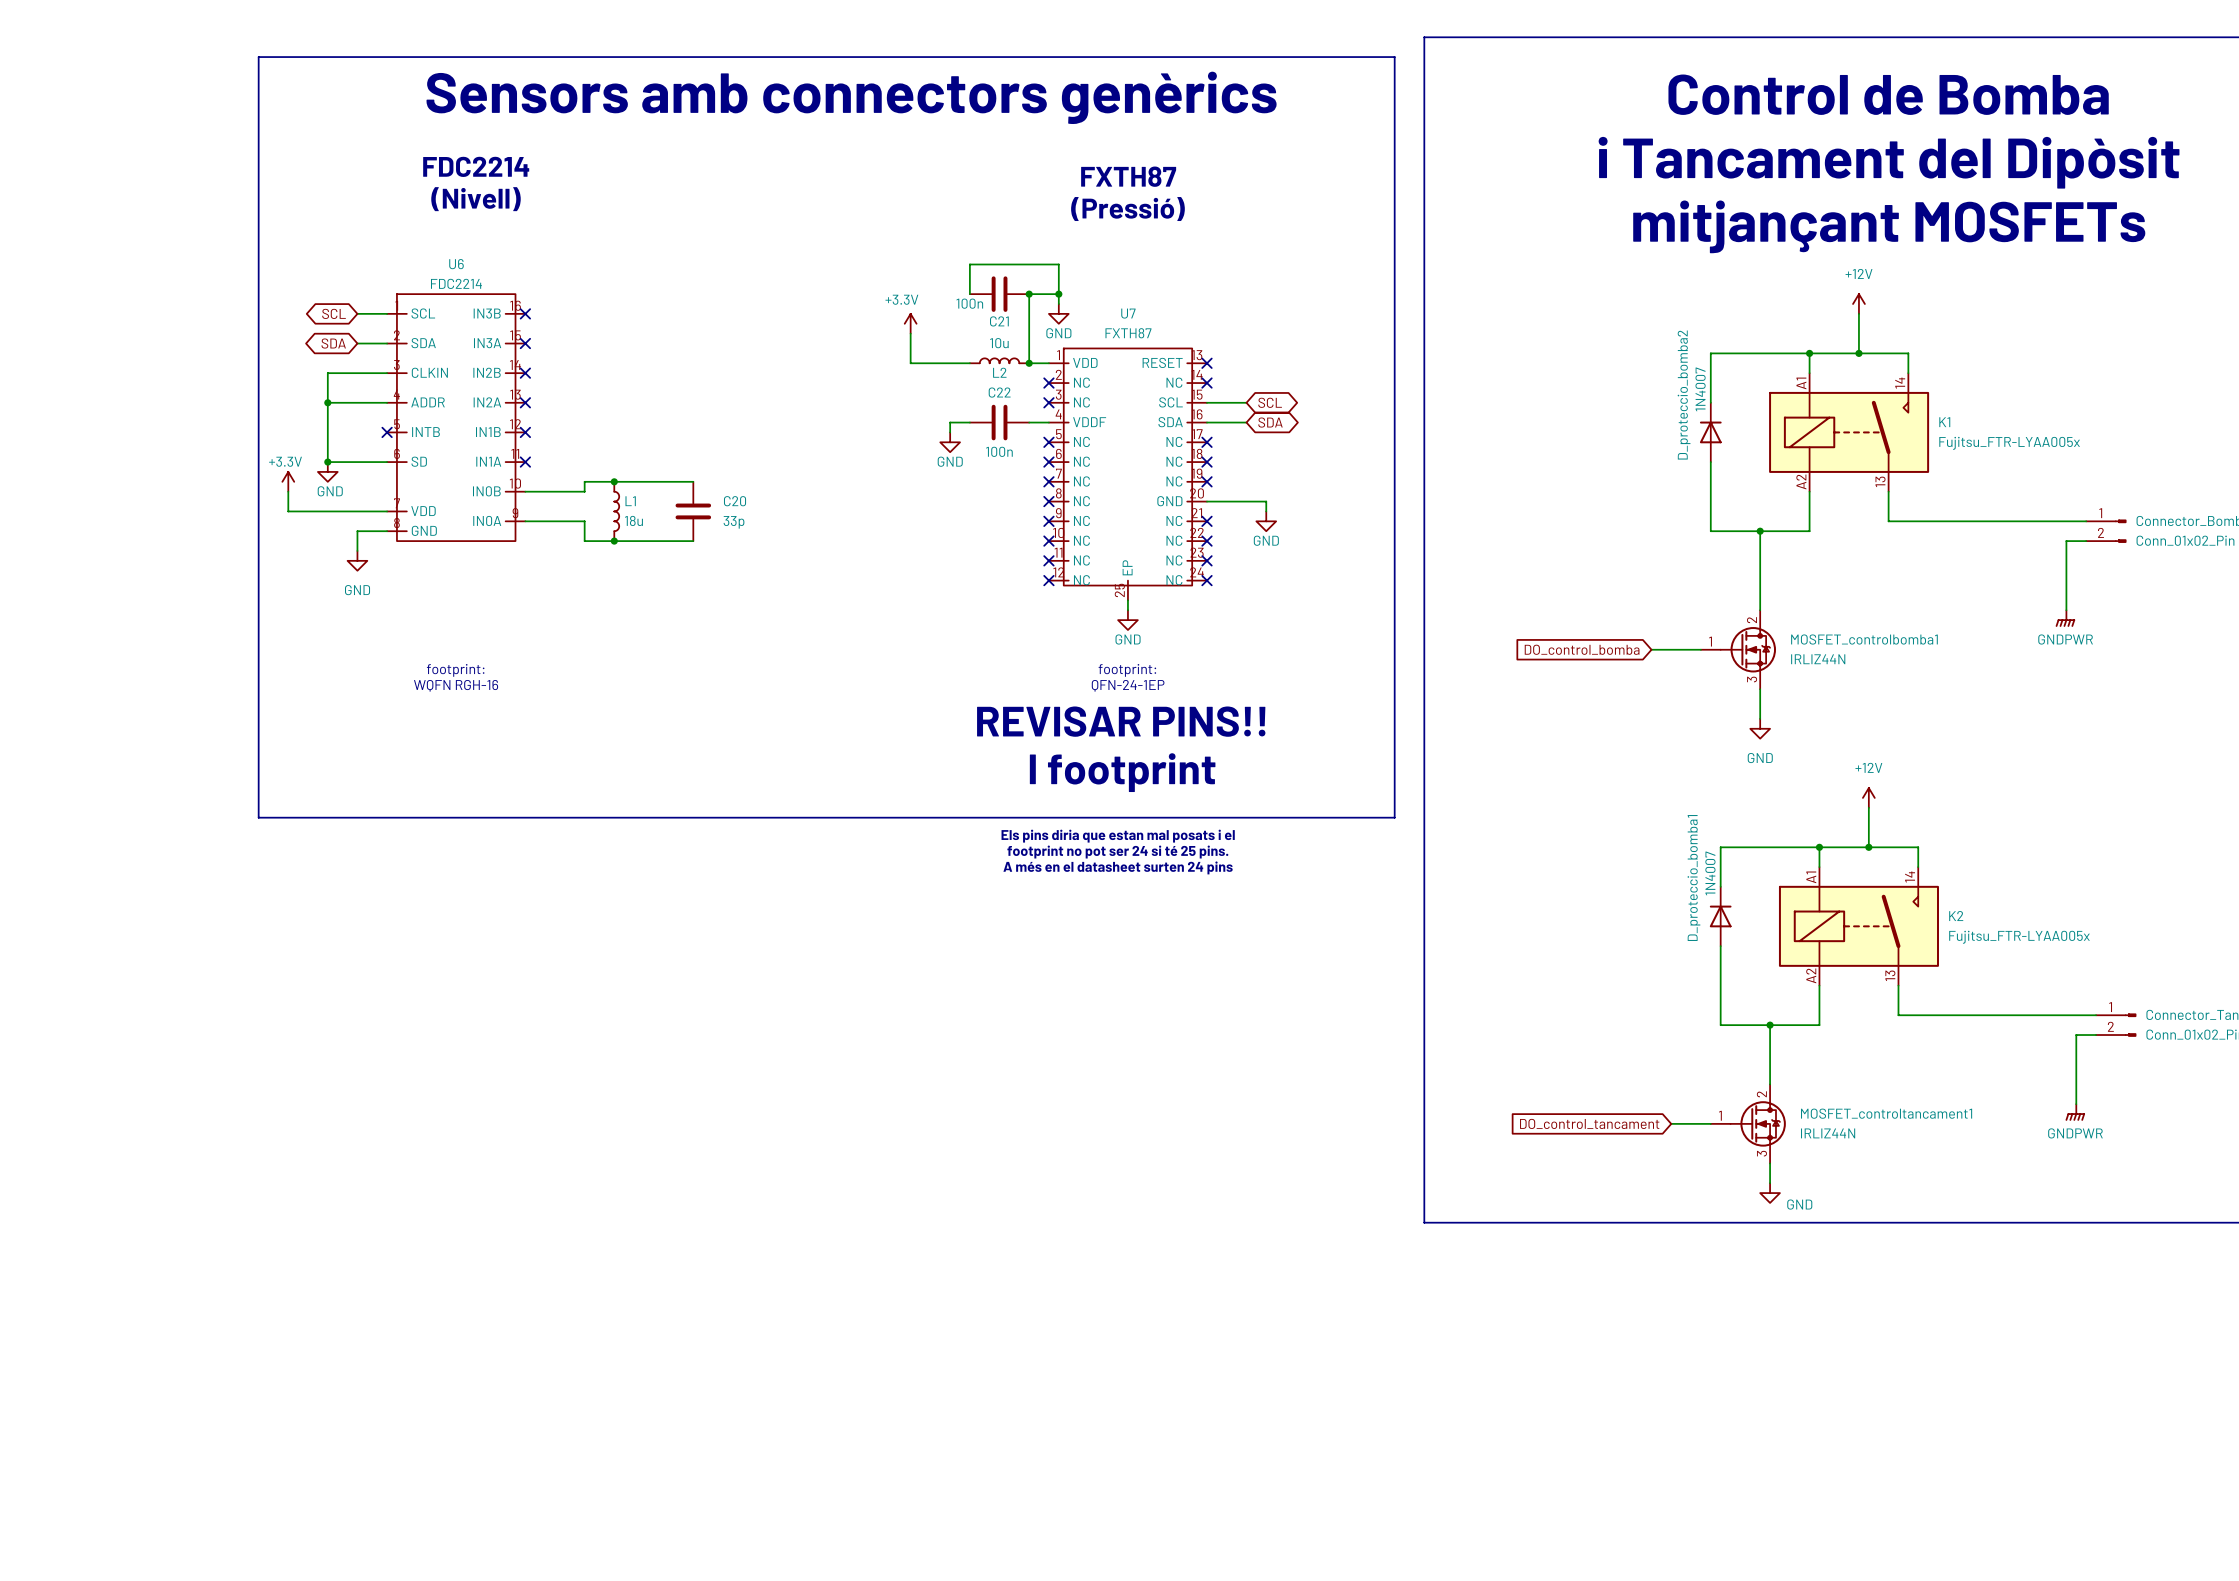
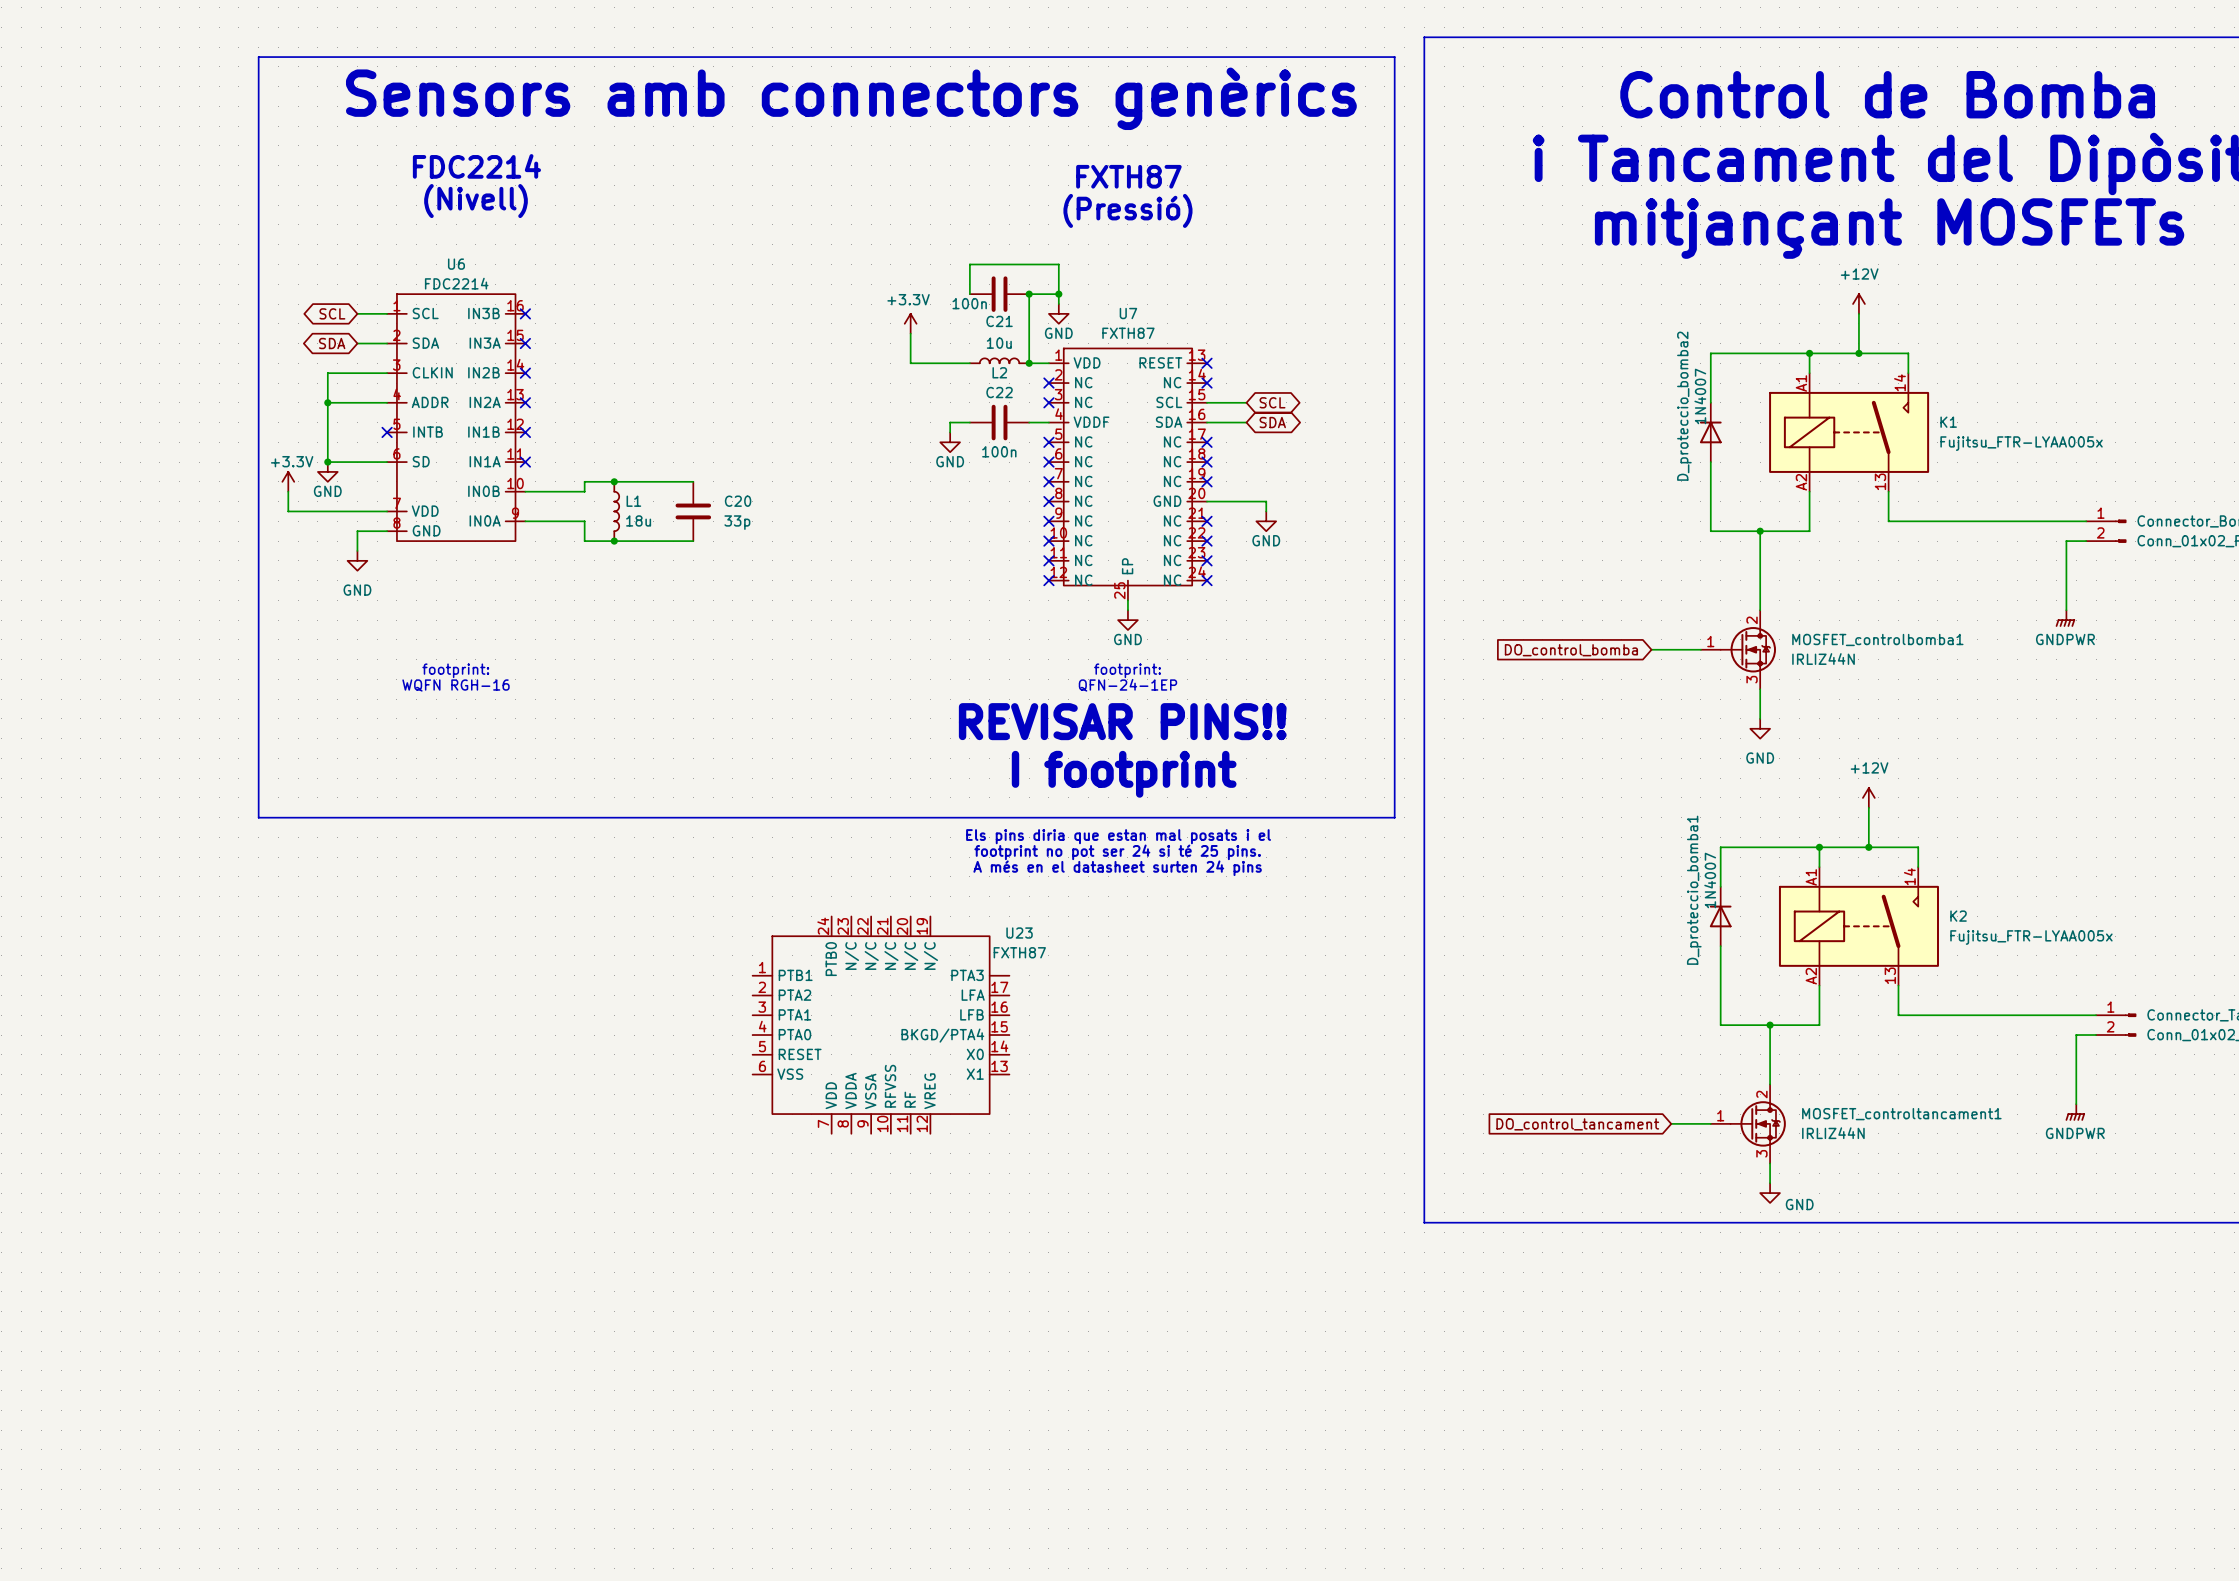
U23: none -> FXTH87 (881, 1025)

